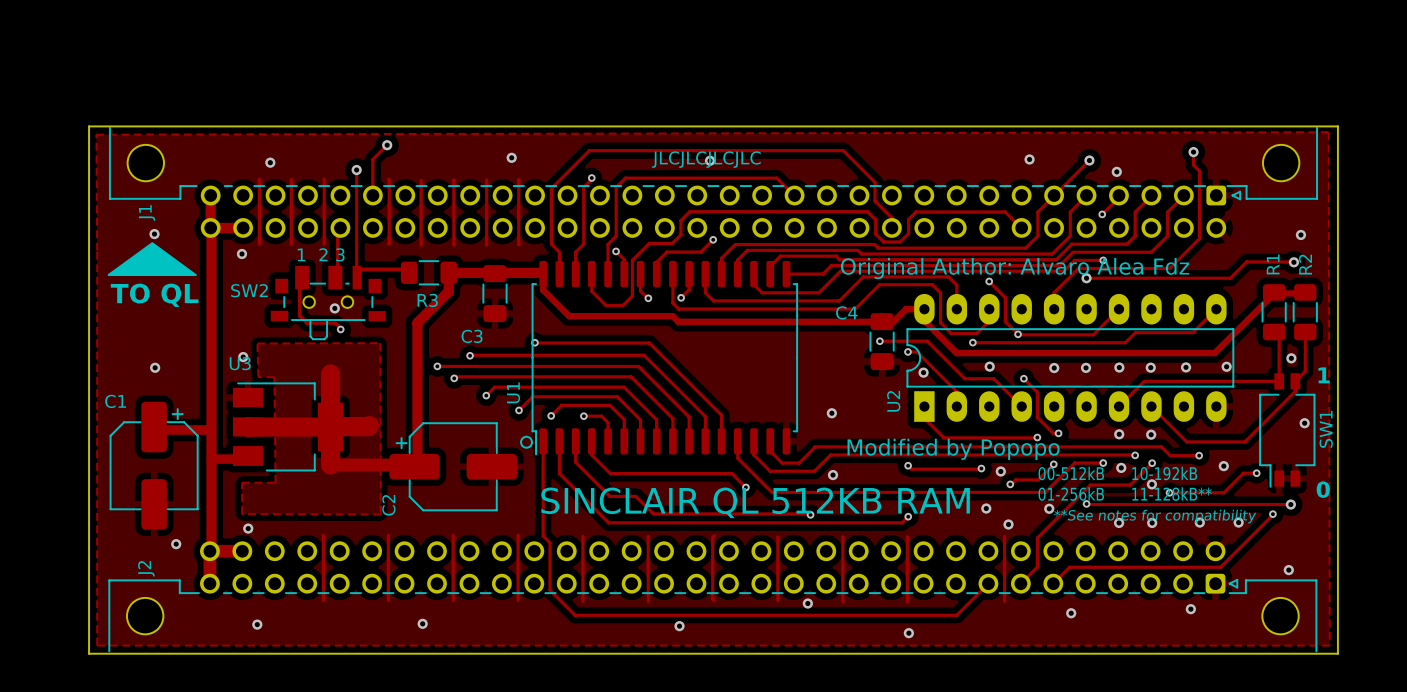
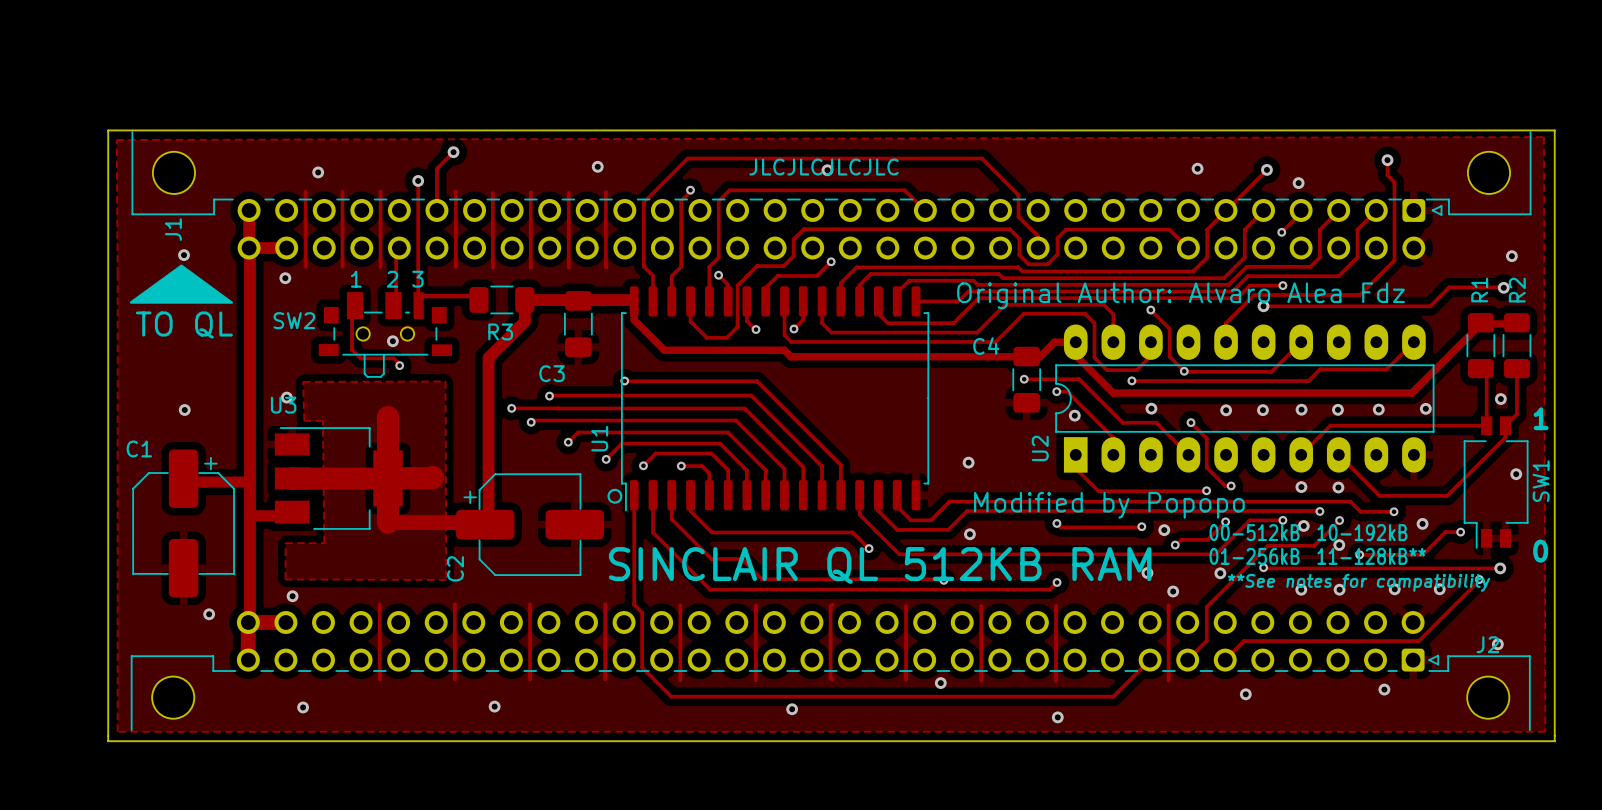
J2 footprint: [108, 541, 1318, 653] -> [130, 611, 1531, 732]
J2 name rotation: 0° (146, 568) -> 90° clockwise (1487, 644)
J2 name position: J2 (146, 568) -> J2 (1487, 644)

